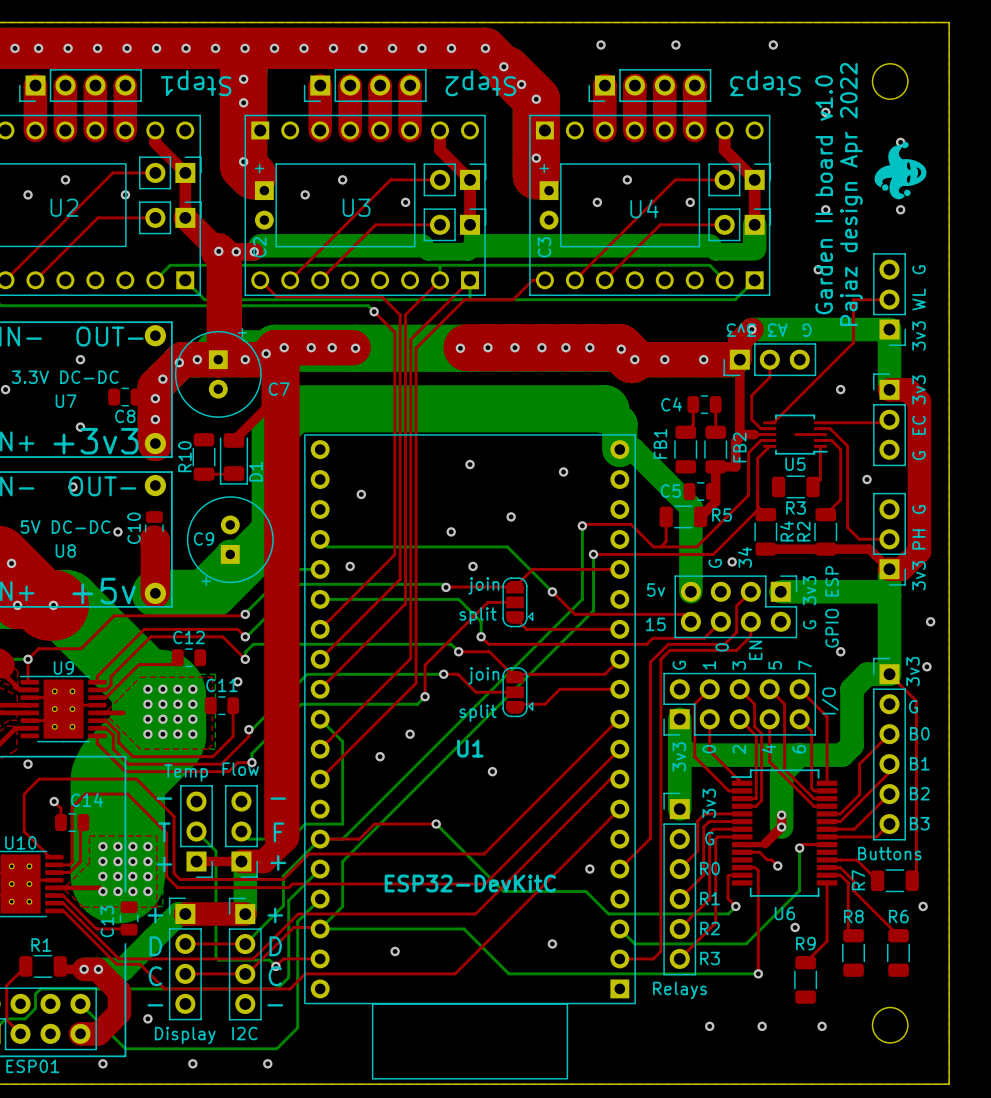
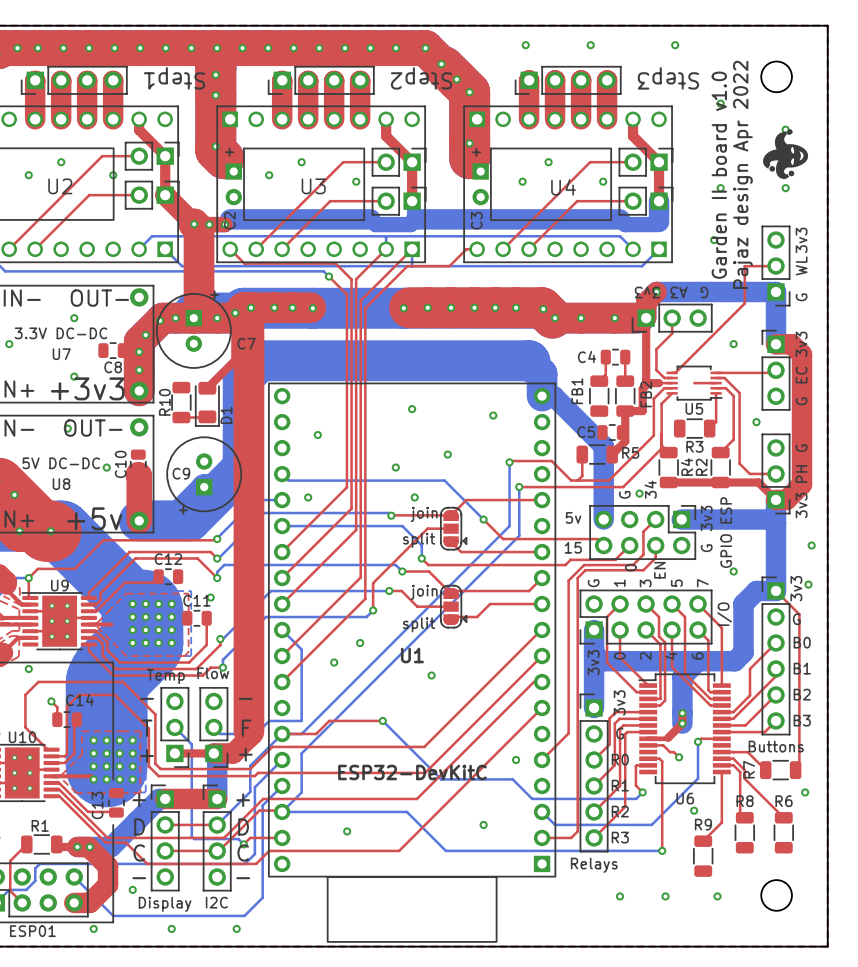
text: G (919, 269) -> 3v3 (801, 240)
text: 3v3 (919, 335) -> G (801, 297)

